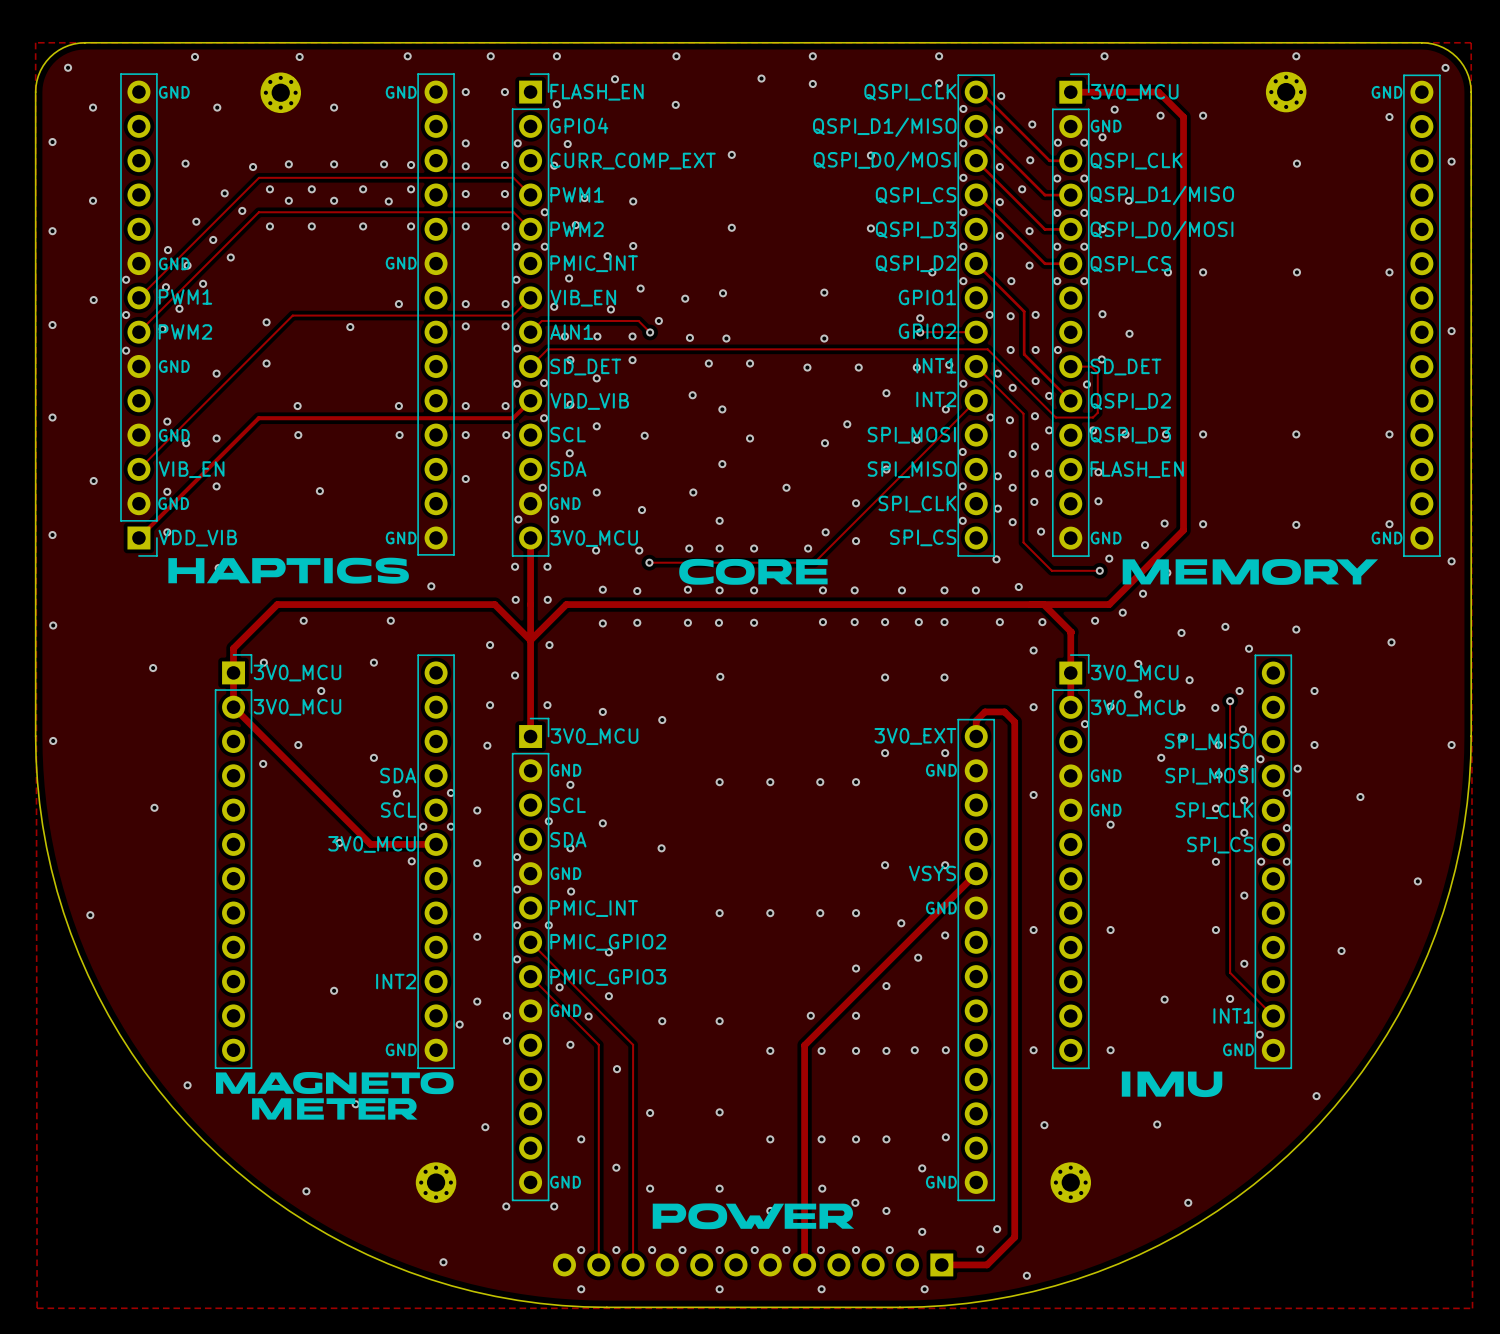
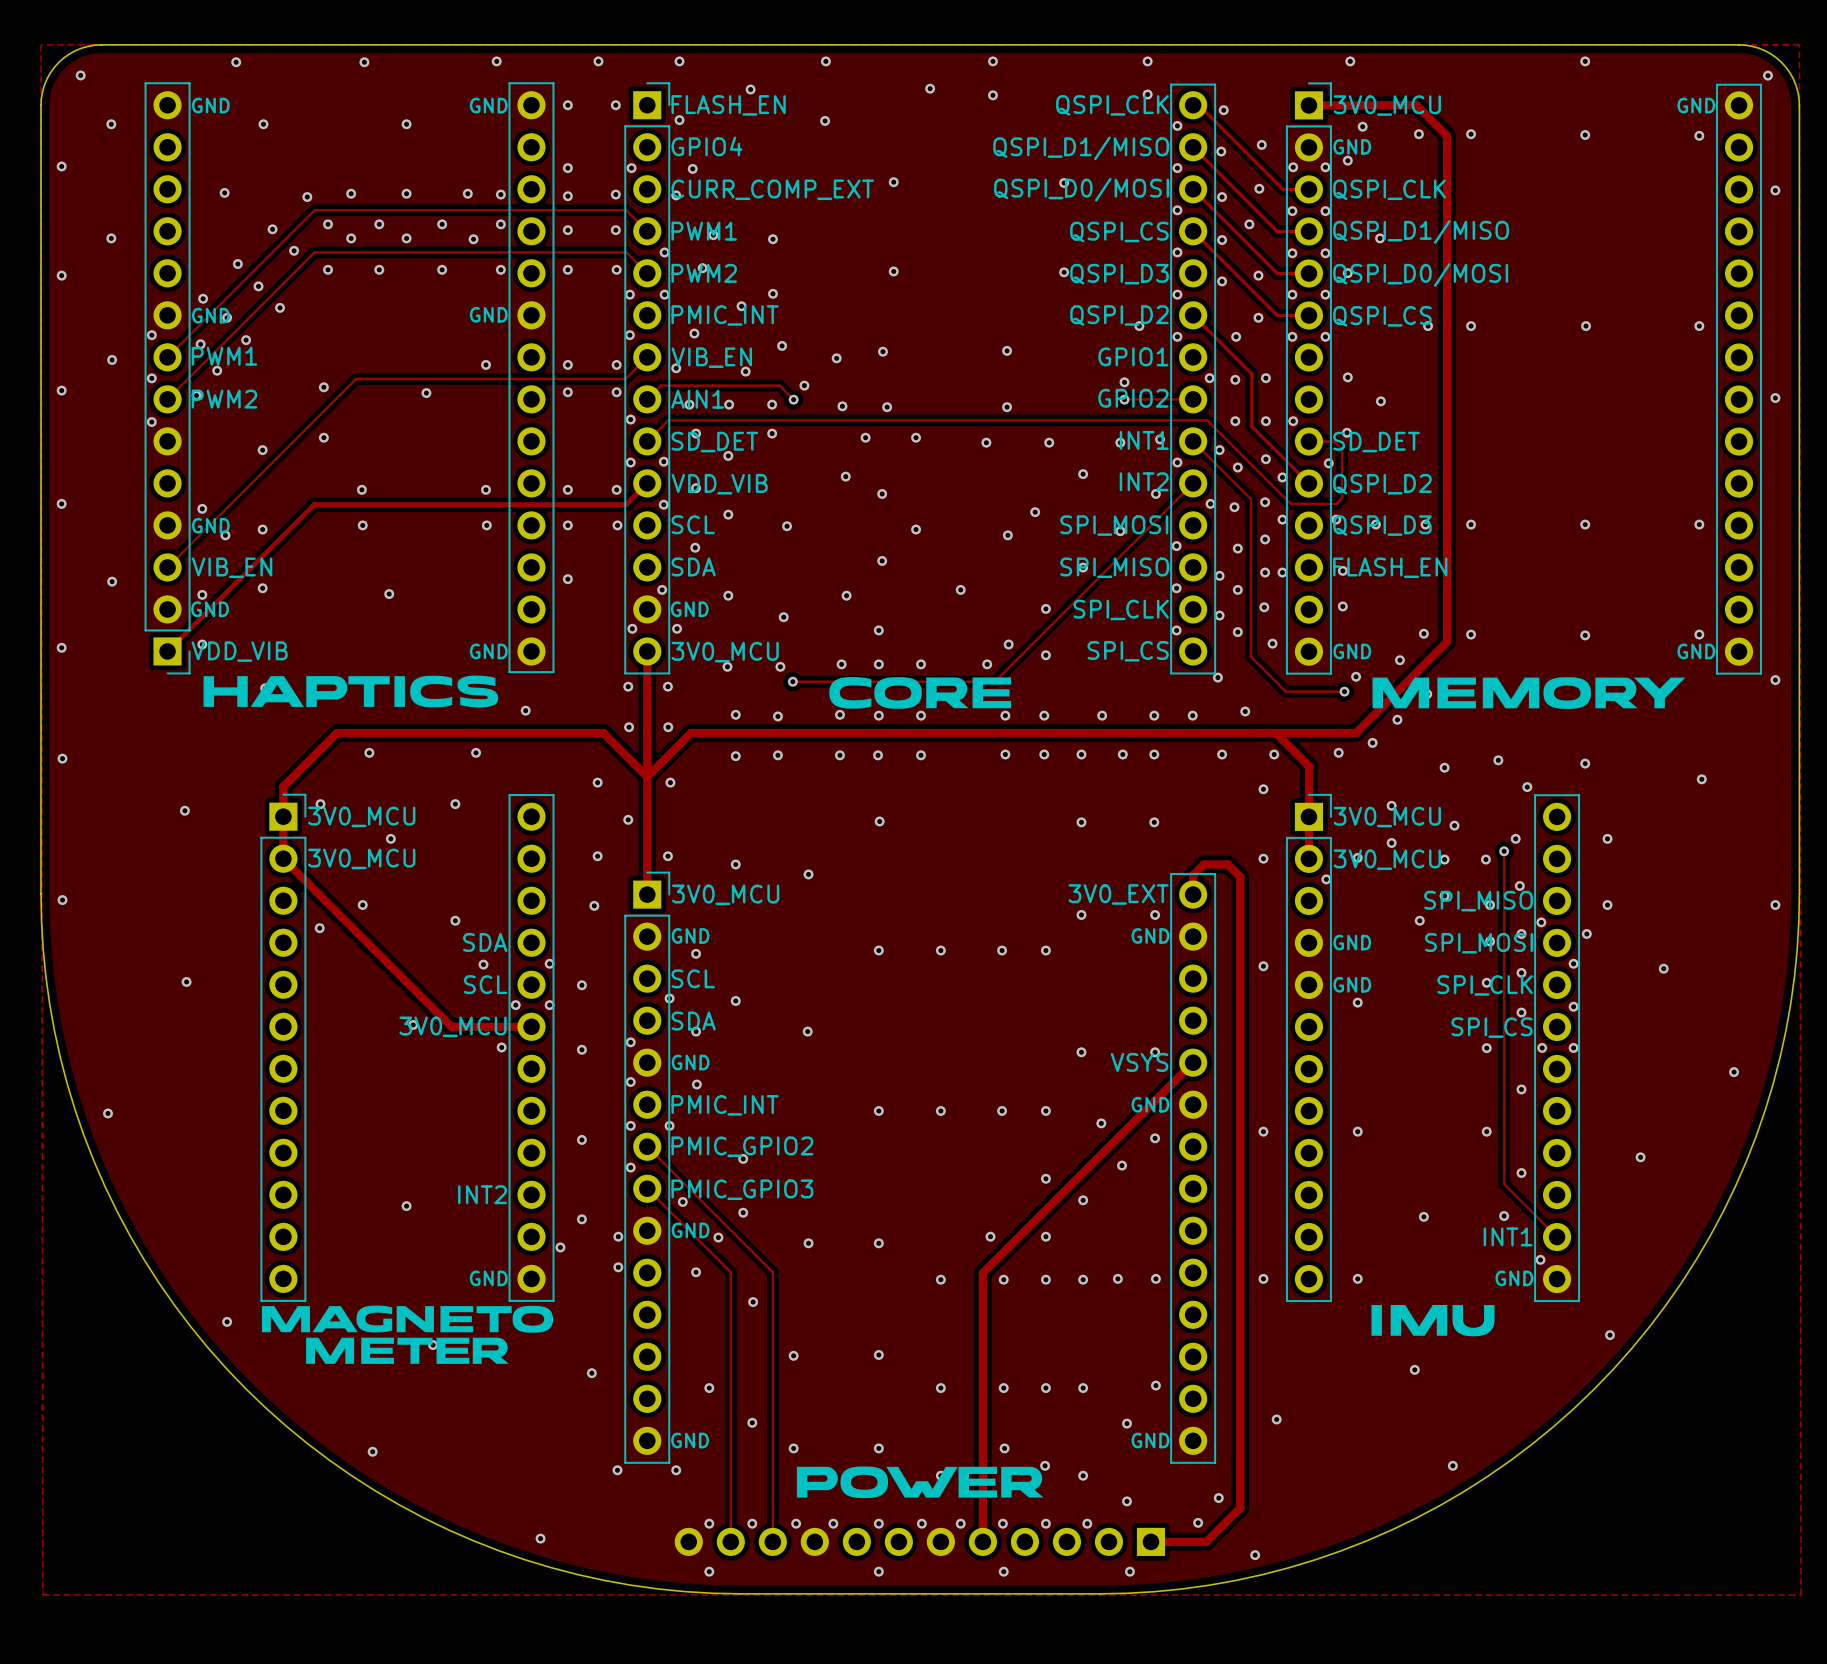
part: (280, 92) -> none
part: (1286, 92) -> none
via position: (1296, 163) -> (1585, 135)
text: GND (174, 366) -> none
via position: (1044, 1125) -> (1276, 1419)
part: (436, 1182) -> none
part: (1070, 1182) -> none

